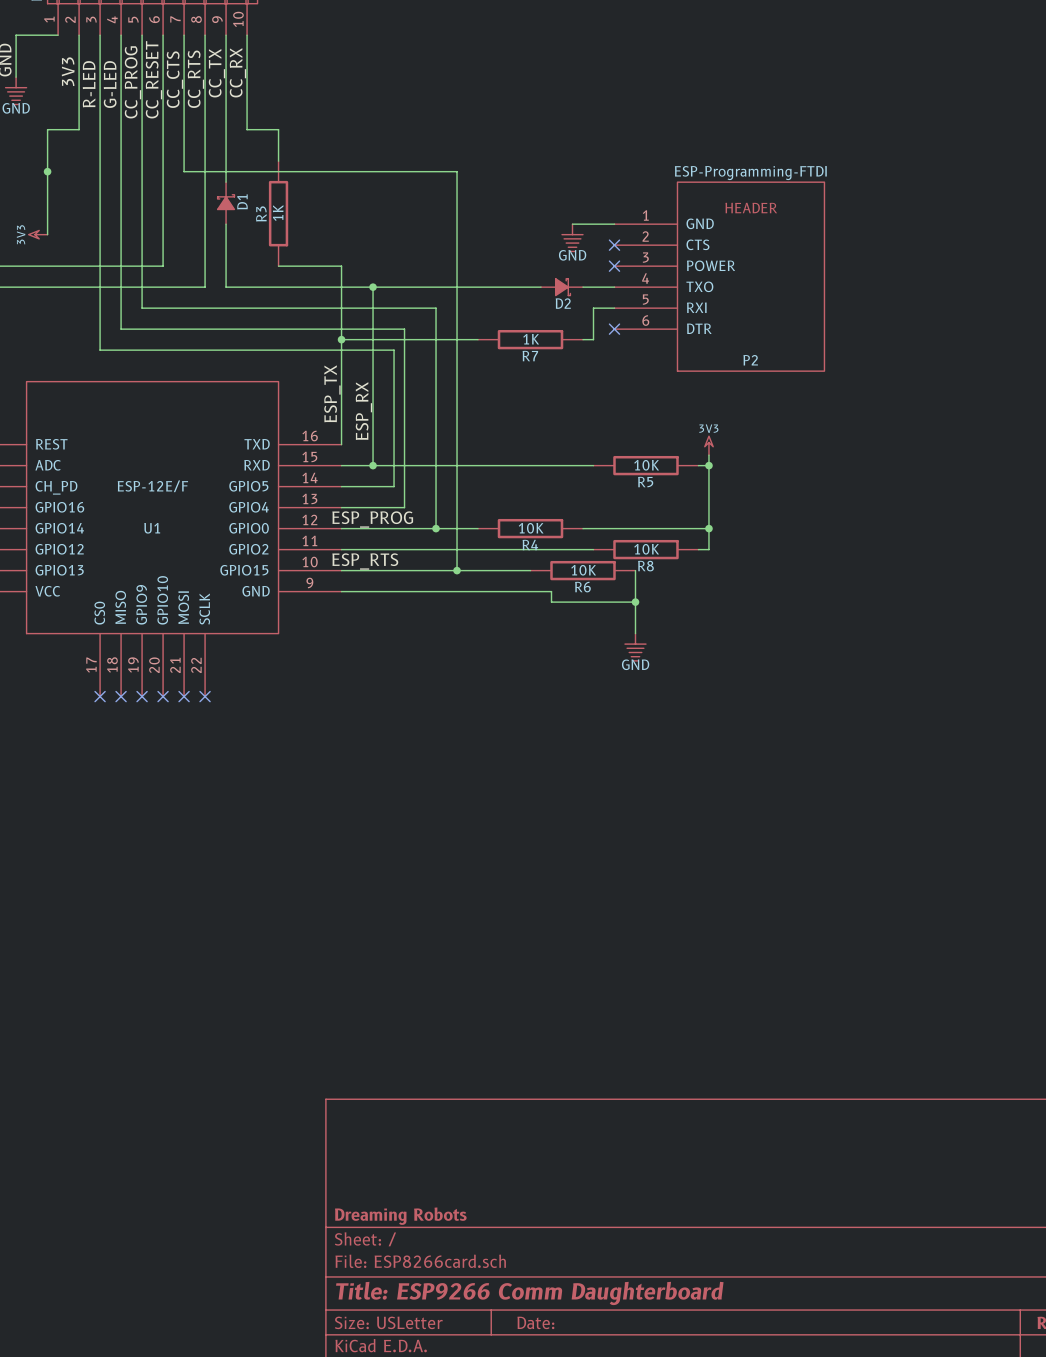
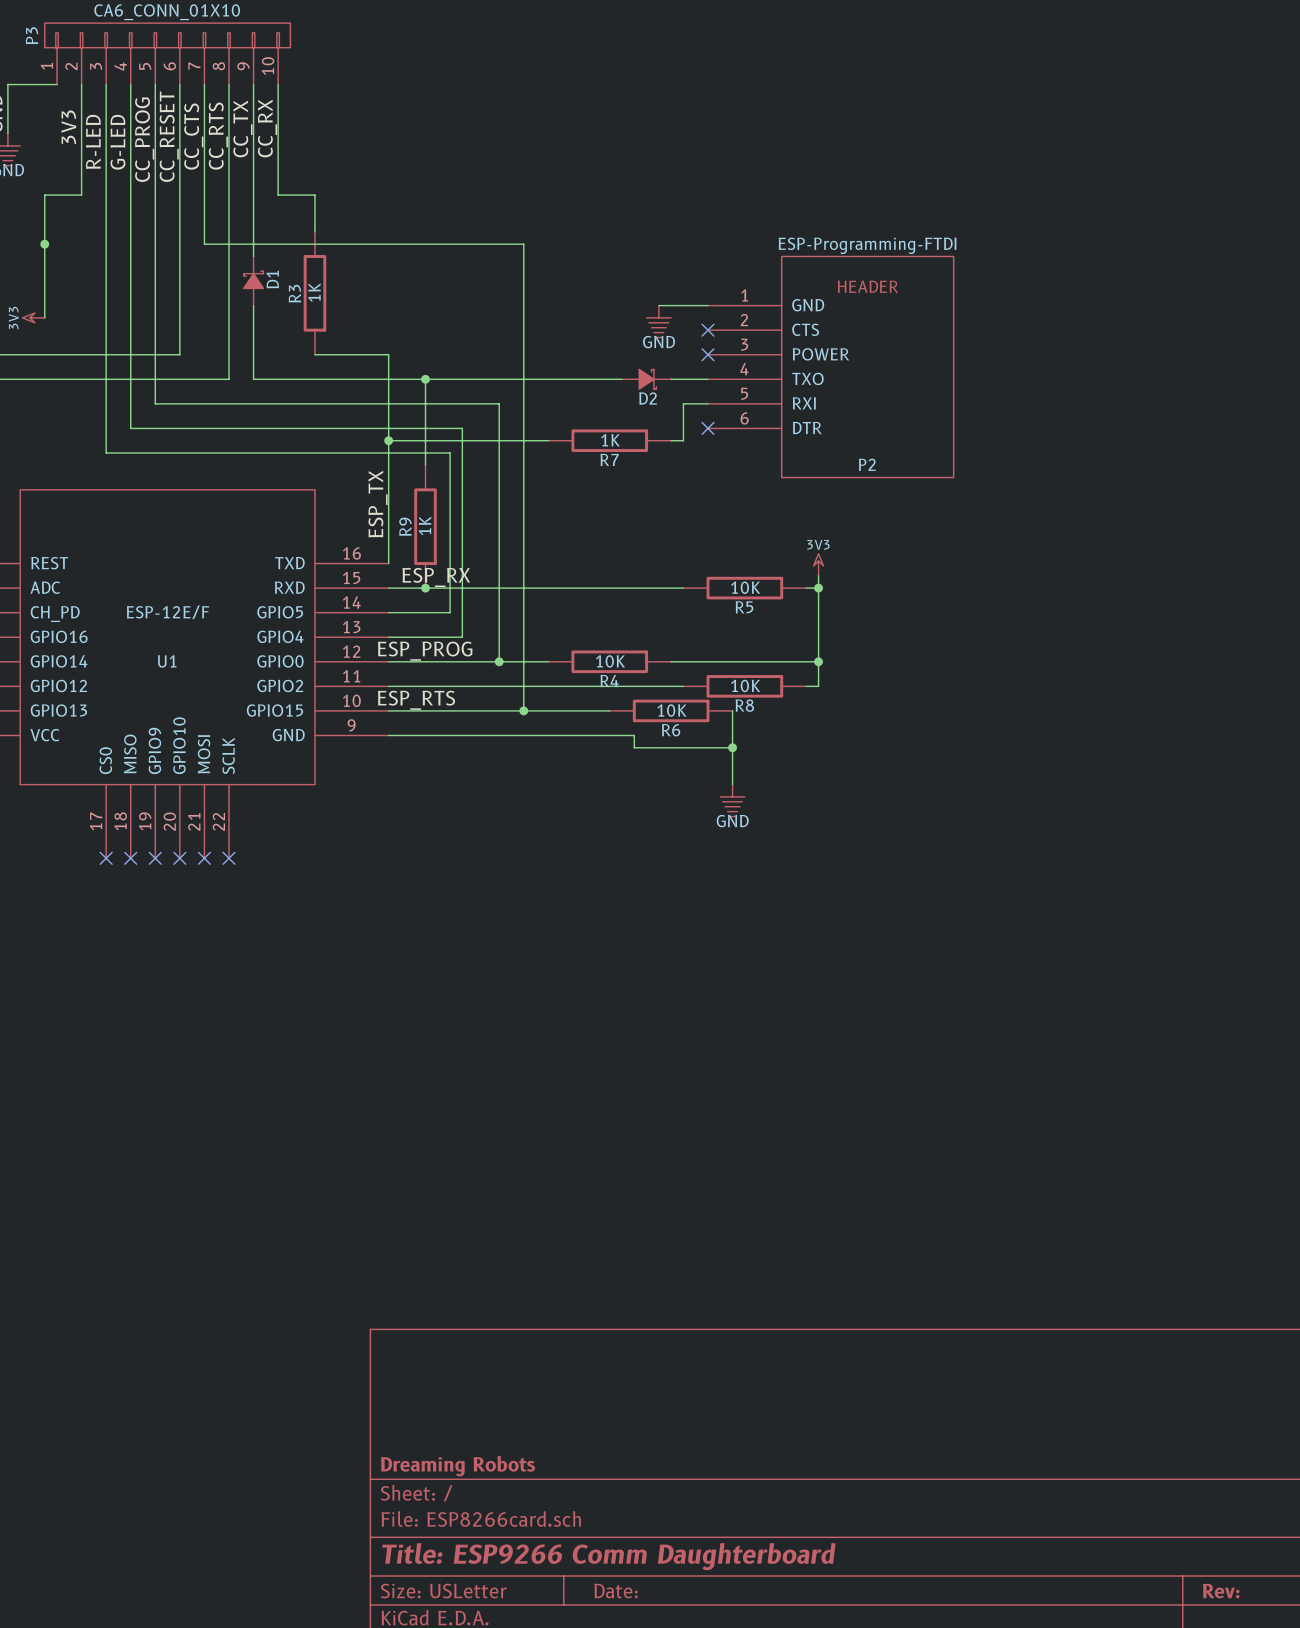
wire: (373, 360) (373, 465) -> none
label rotation: 0° (363, 411) -> 90° clockwise (436, 577)
R9: none -> 1K (425, 526)

